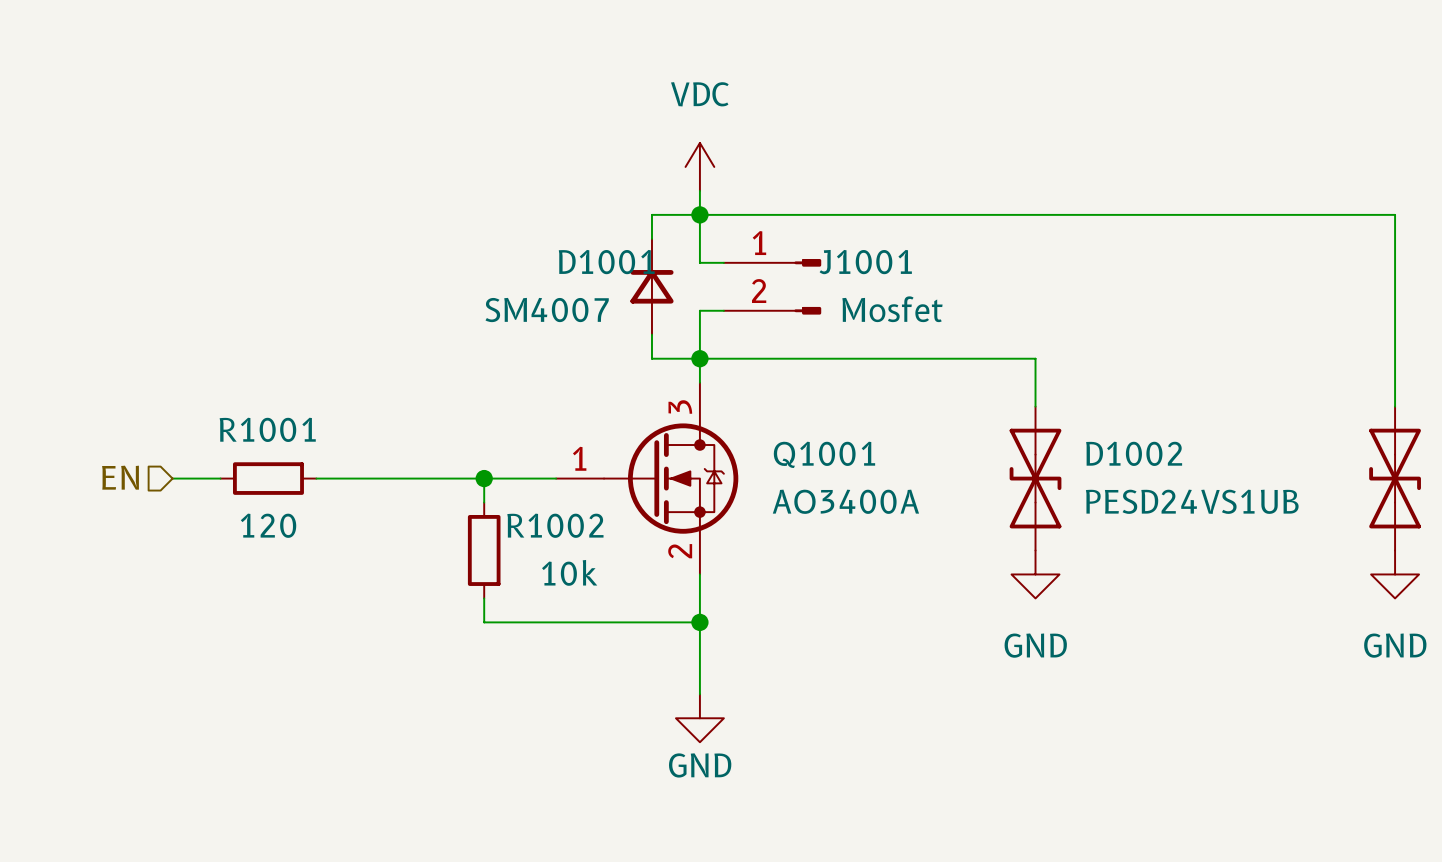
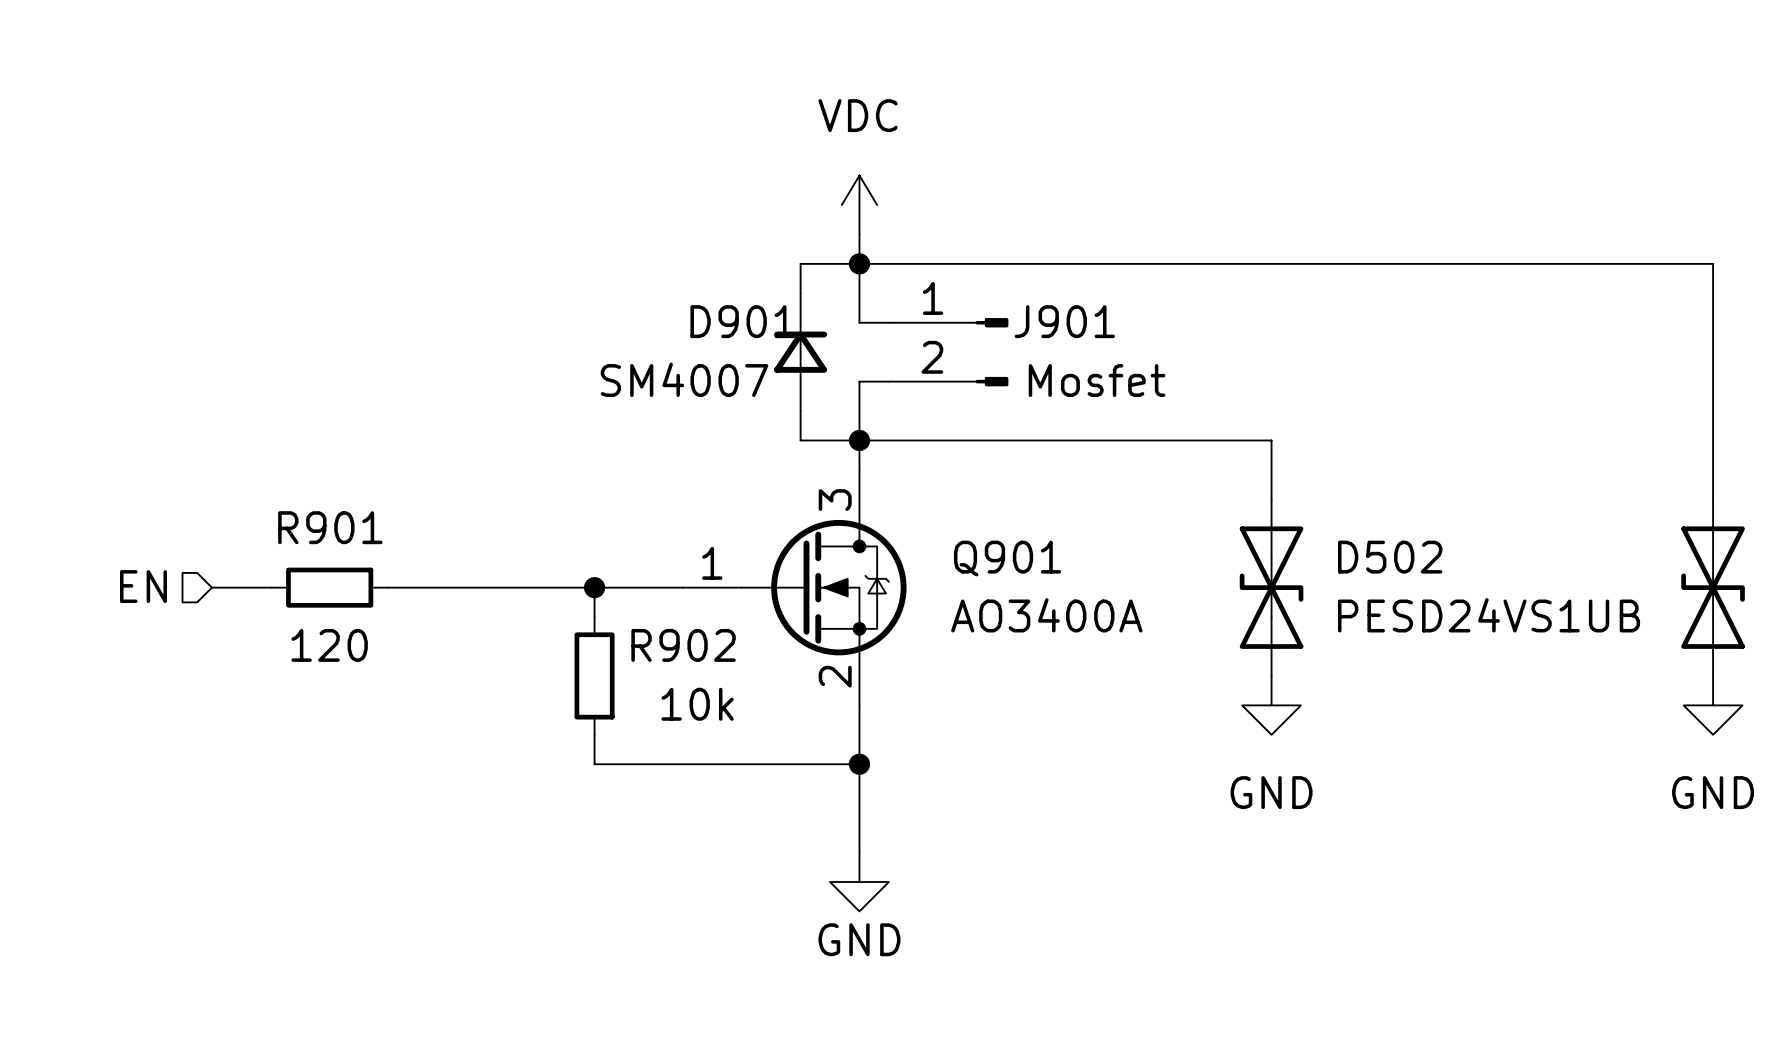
D1001 name: D1001 (606, 262) -> D901 (742, 321)
J1001 name: J1001 (865, 262) -> J901 (1064, 321)
R1001 name: R1001 (267, 429) -> R901 (330, 527)
D1002 name: D1002 (1134, 453) -> D502 (1390, 557)
Q1001 name: Q1001 (824, 454) -> Q901 (1007, 558)
R1002 name: R1002 (555, 525) -> R902 (683, 645)

